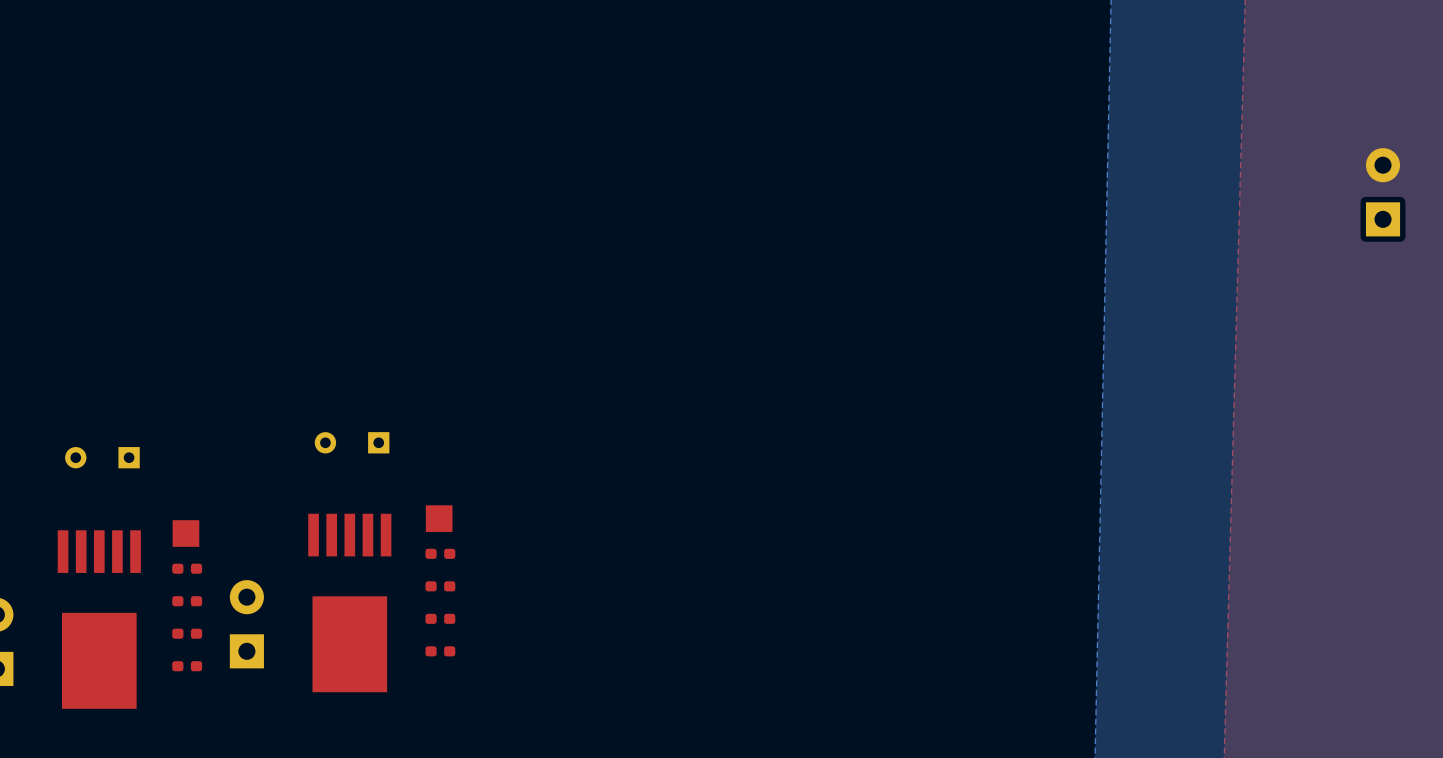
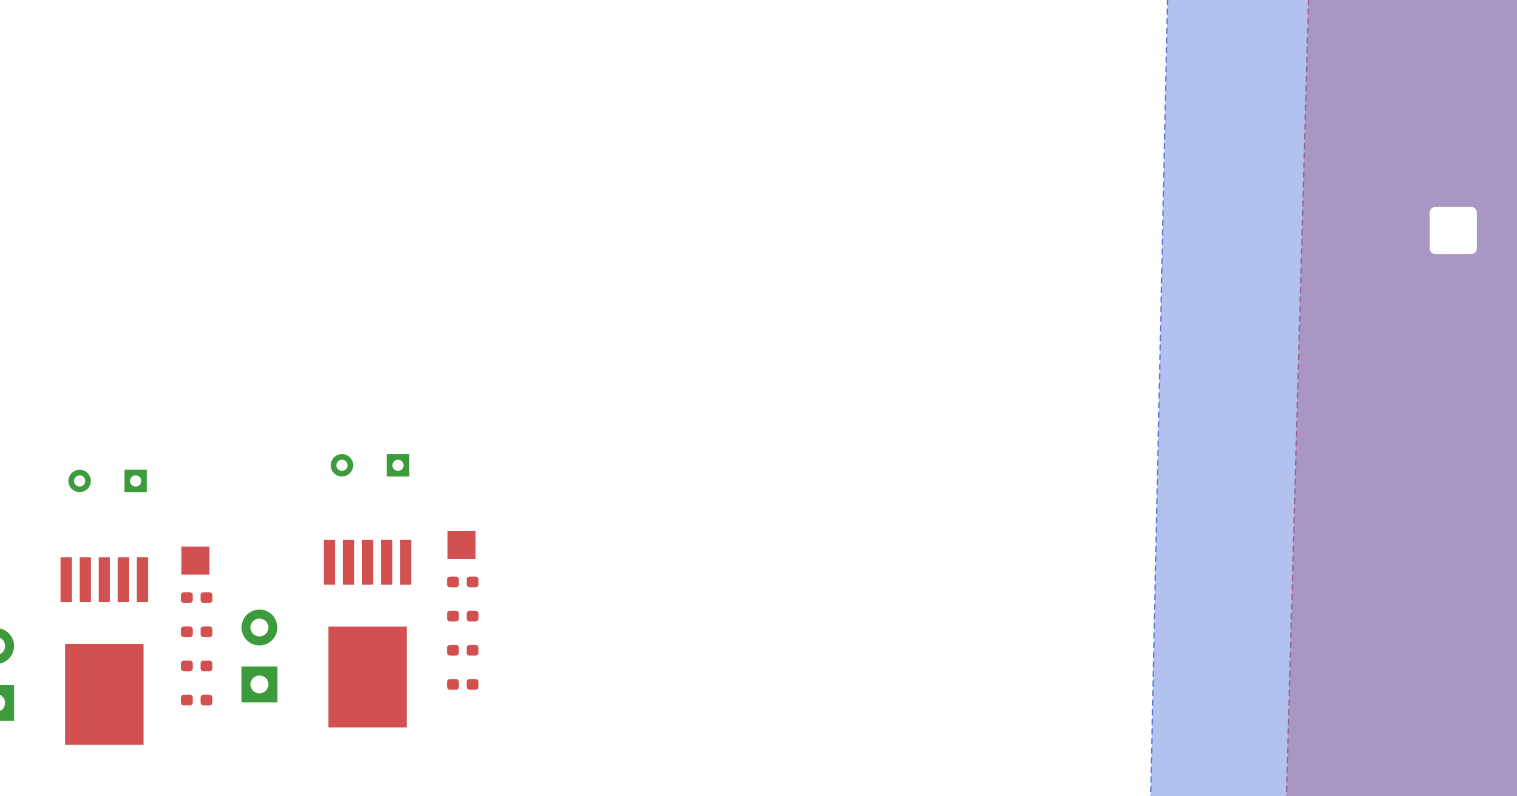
part: (1383, 192) -> none

